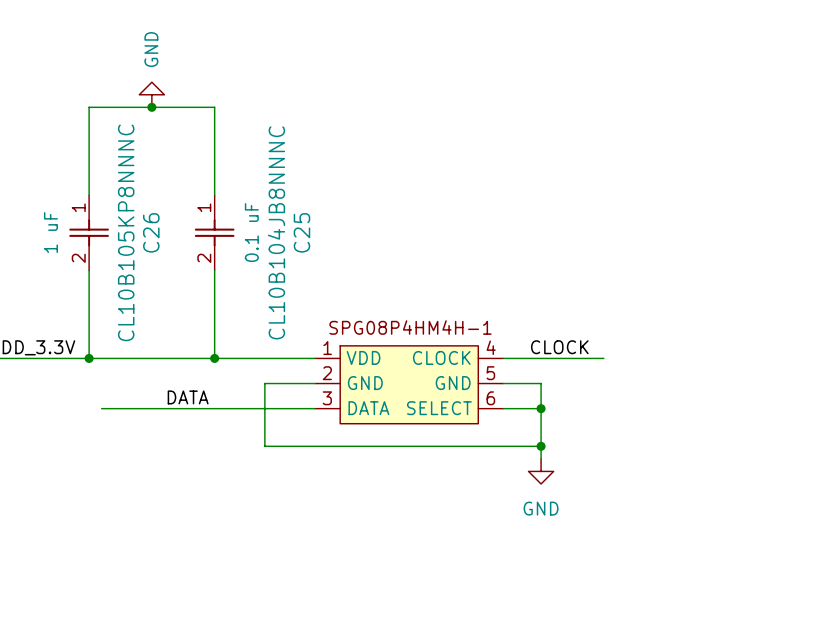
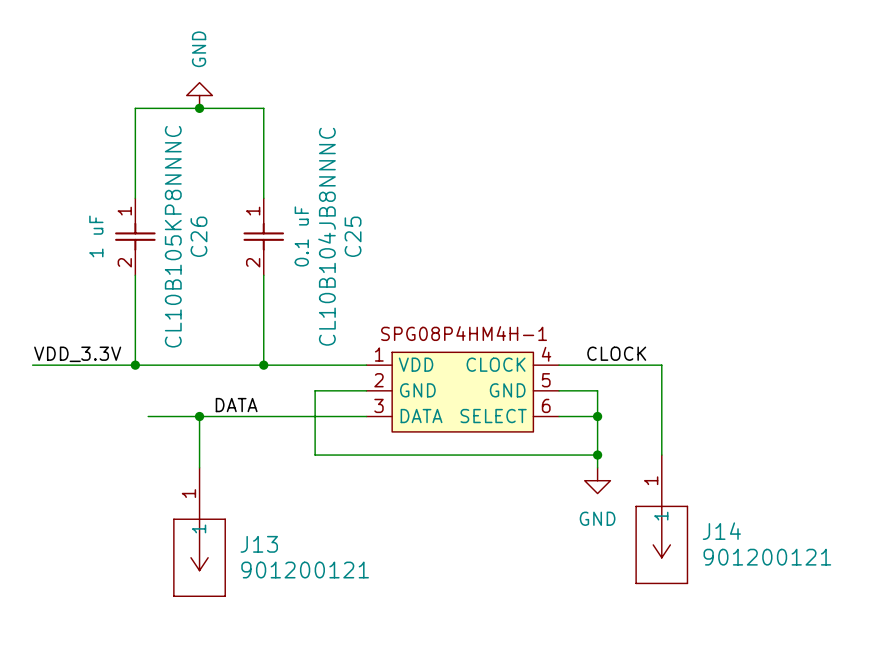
wire: none -> (661, 365) (661, 455)
wire: none -> (199, 416) (199, 467)
junction: none -> (199, 416)
J14: none -> 901200121 (661, 519)
J13: none -> 901200121 (199, 532)

